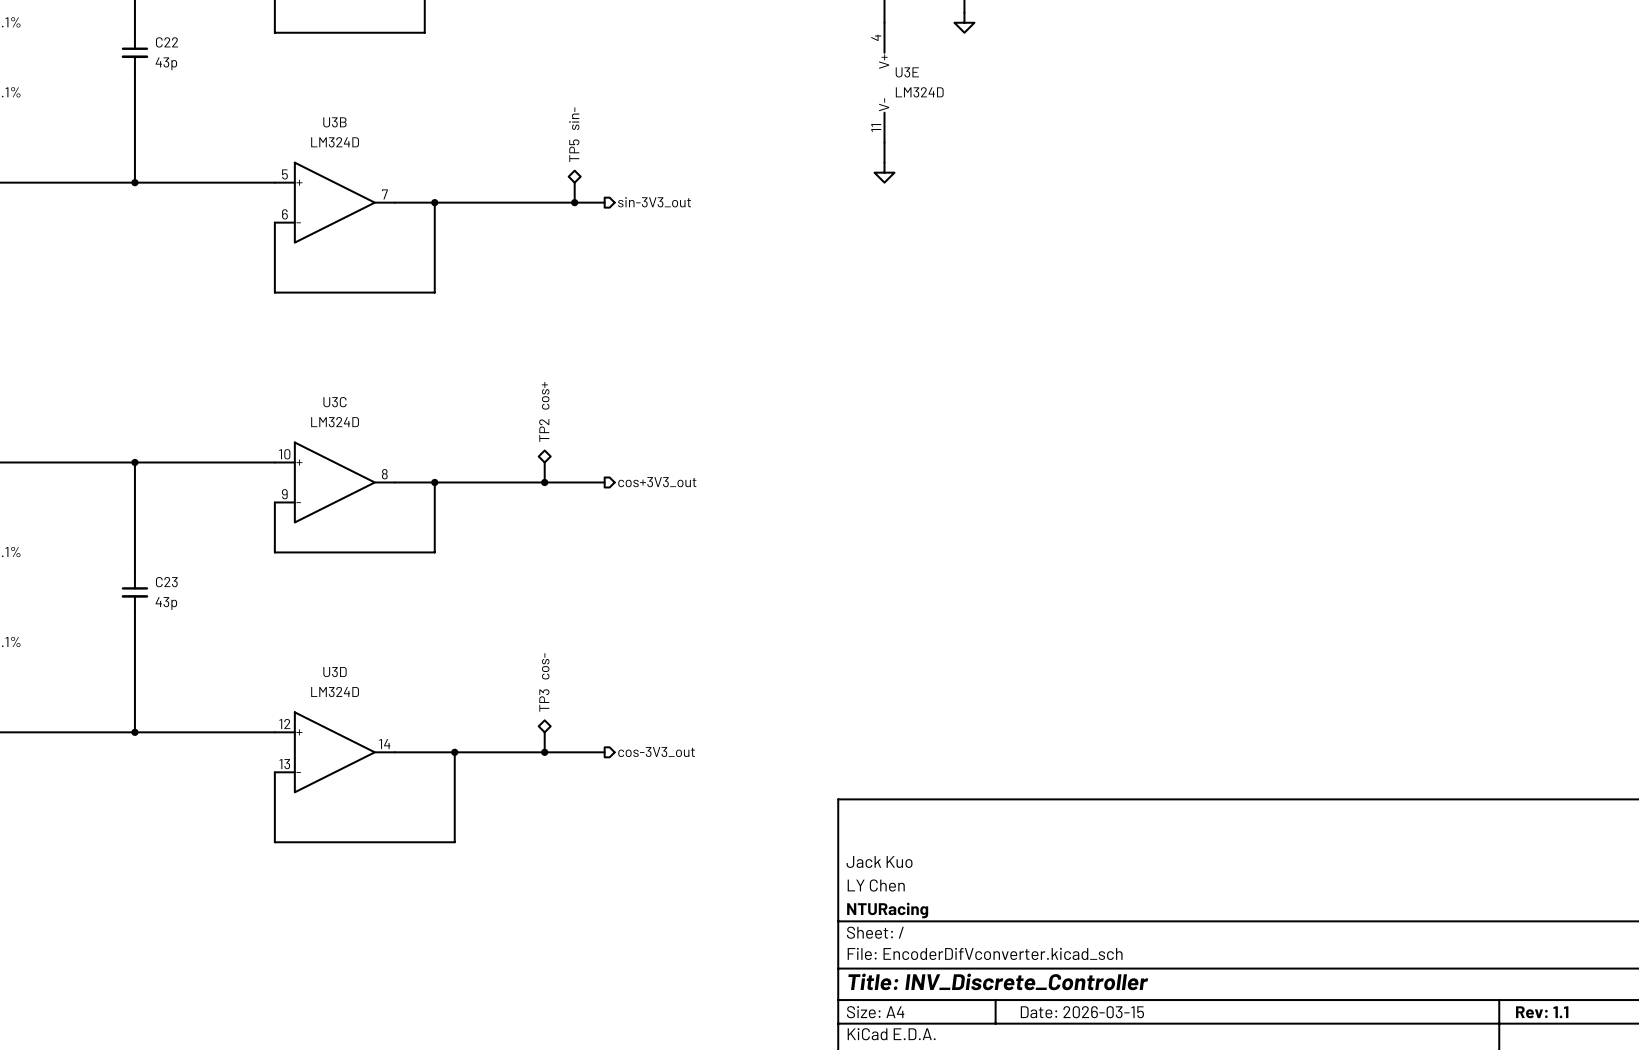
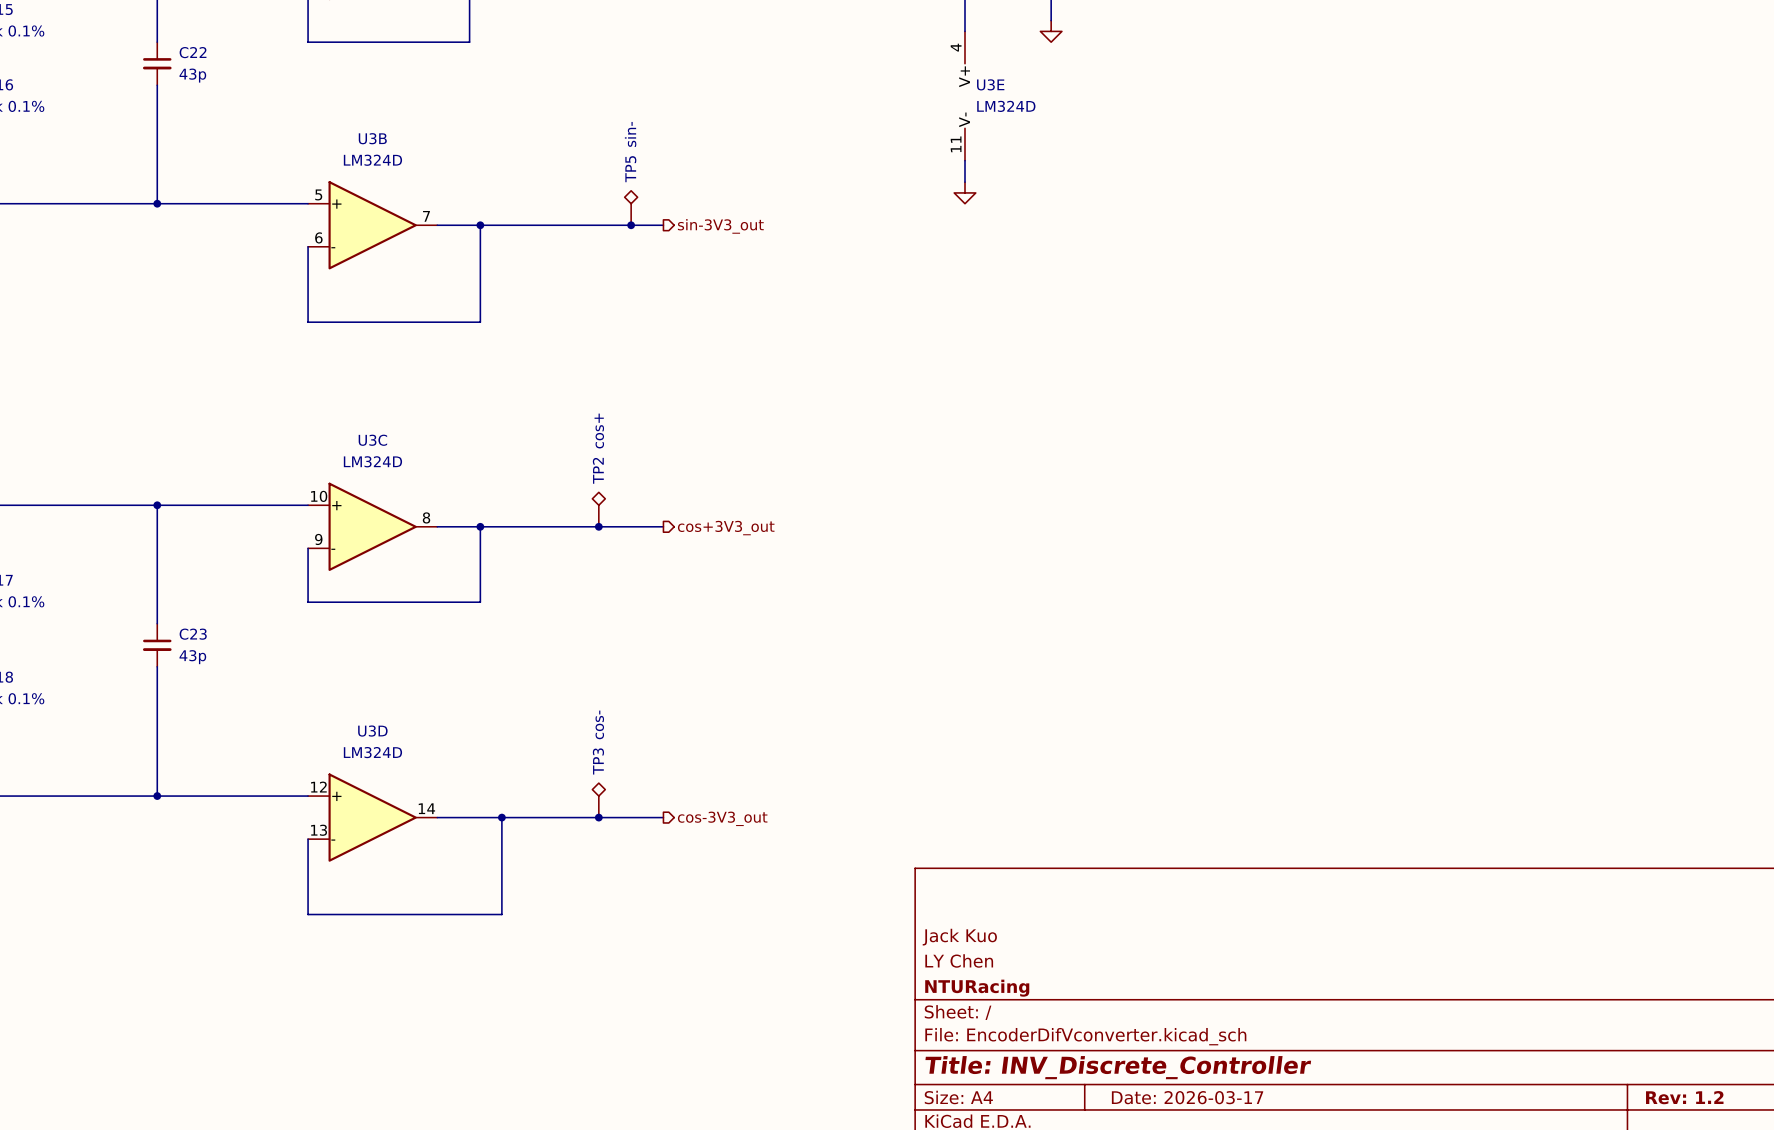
title block: Date: 2026-03-15 (1082, 1012) -> Date: 2026-03-17 (1187, 1097)
title block: Rev: 1.1 (1542, 1012) -> Rev: 1.2 (1684, 1097)

